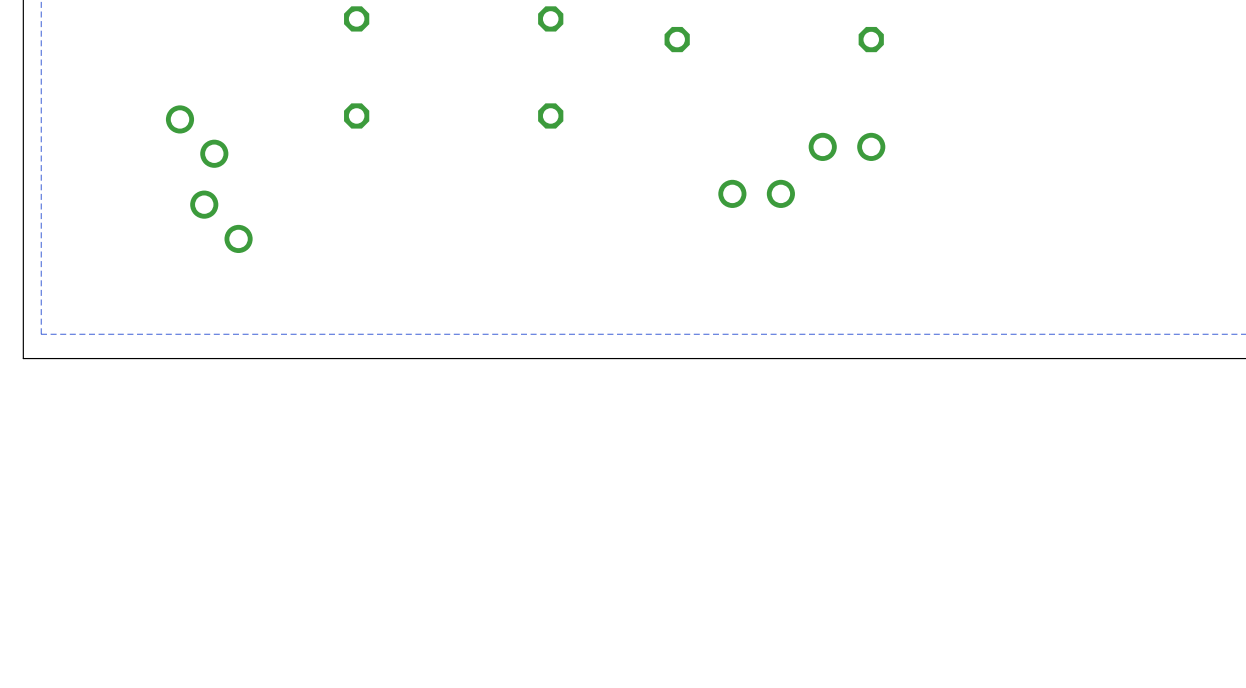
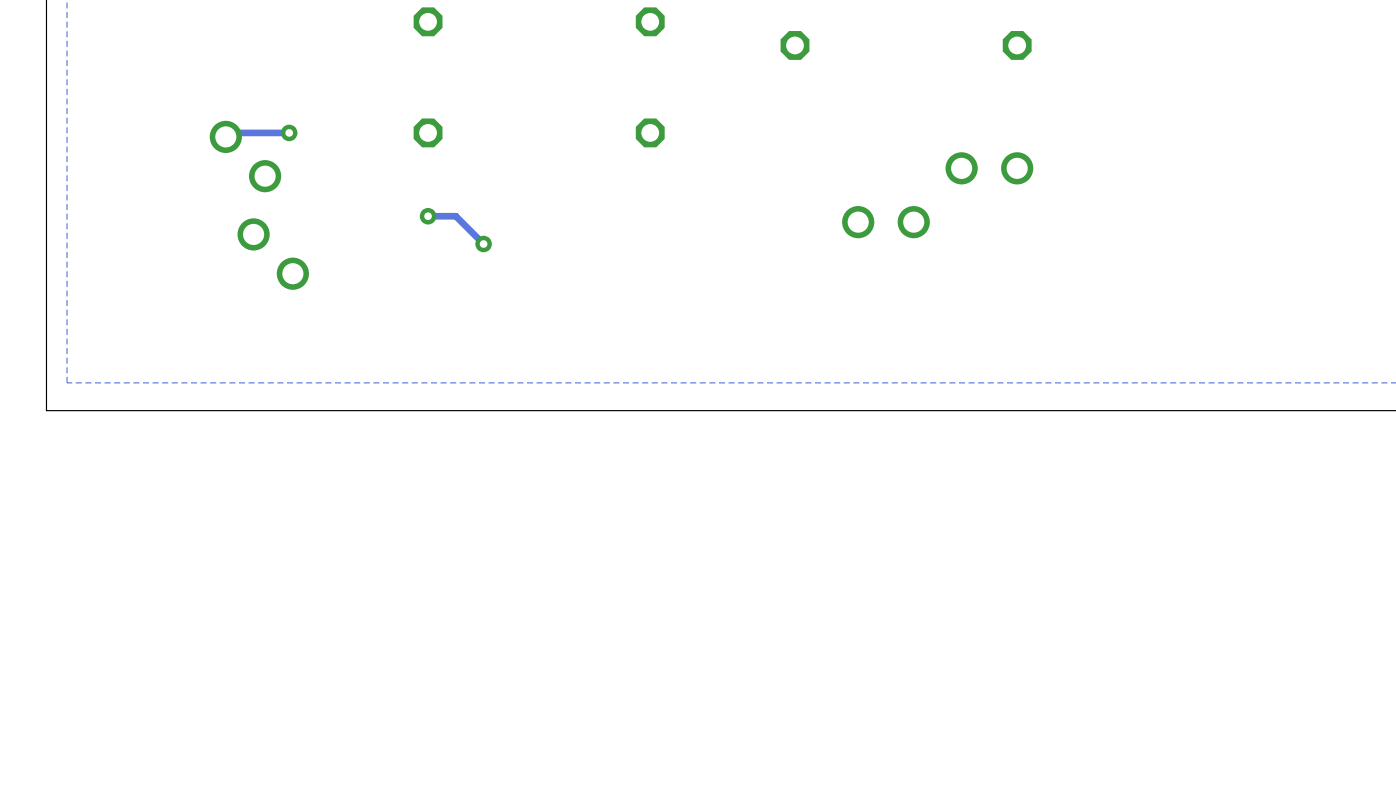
track: none -> (289, 132) (229, 132) (225, 136)
via: none -> (289, 132)
track: none -> (428, 216) (455, 216) (483, 244)
via: none -> (428, 216)
via: none -> (483, 244)

